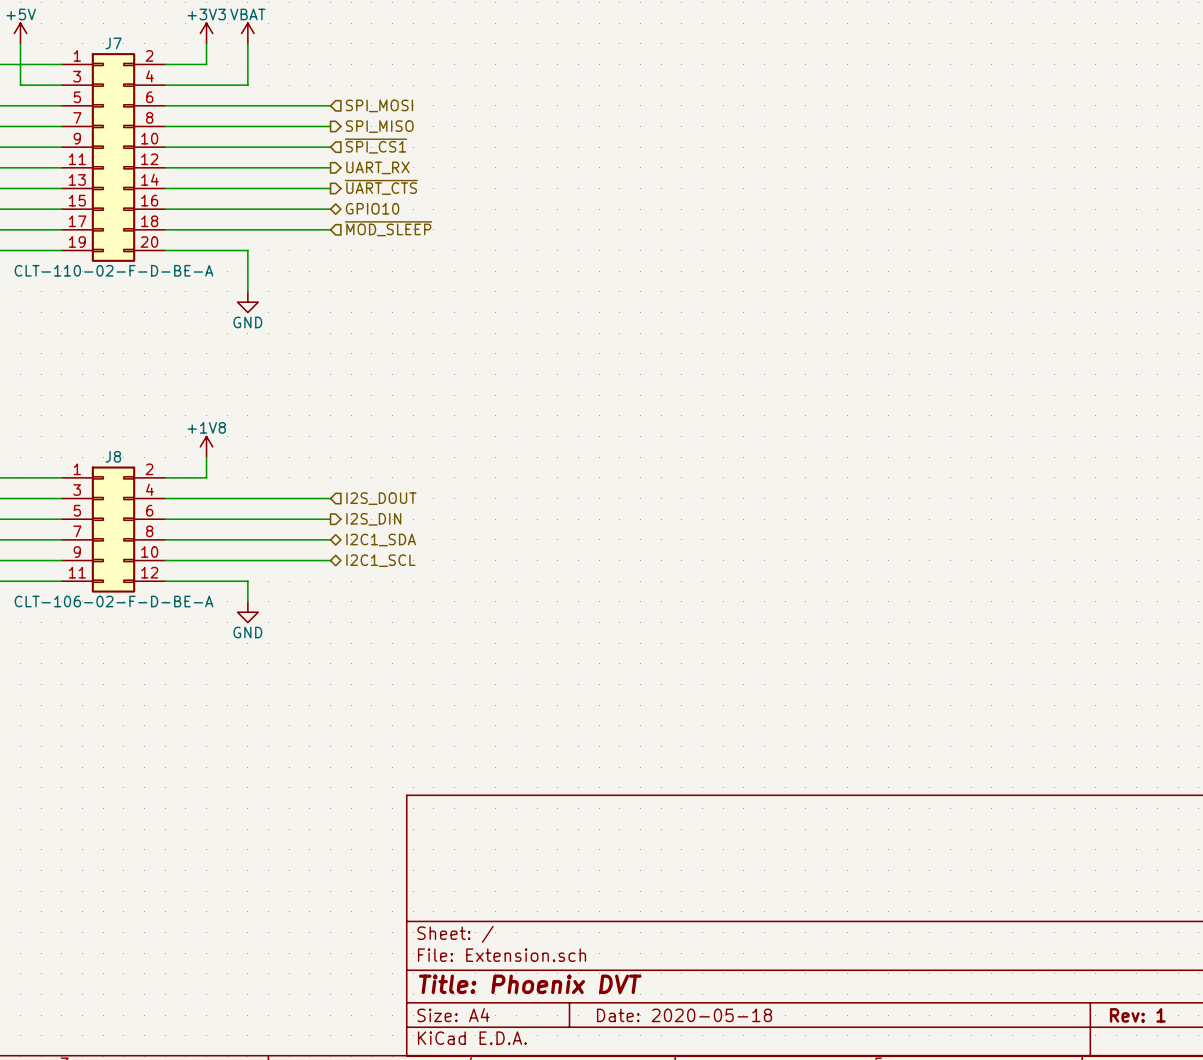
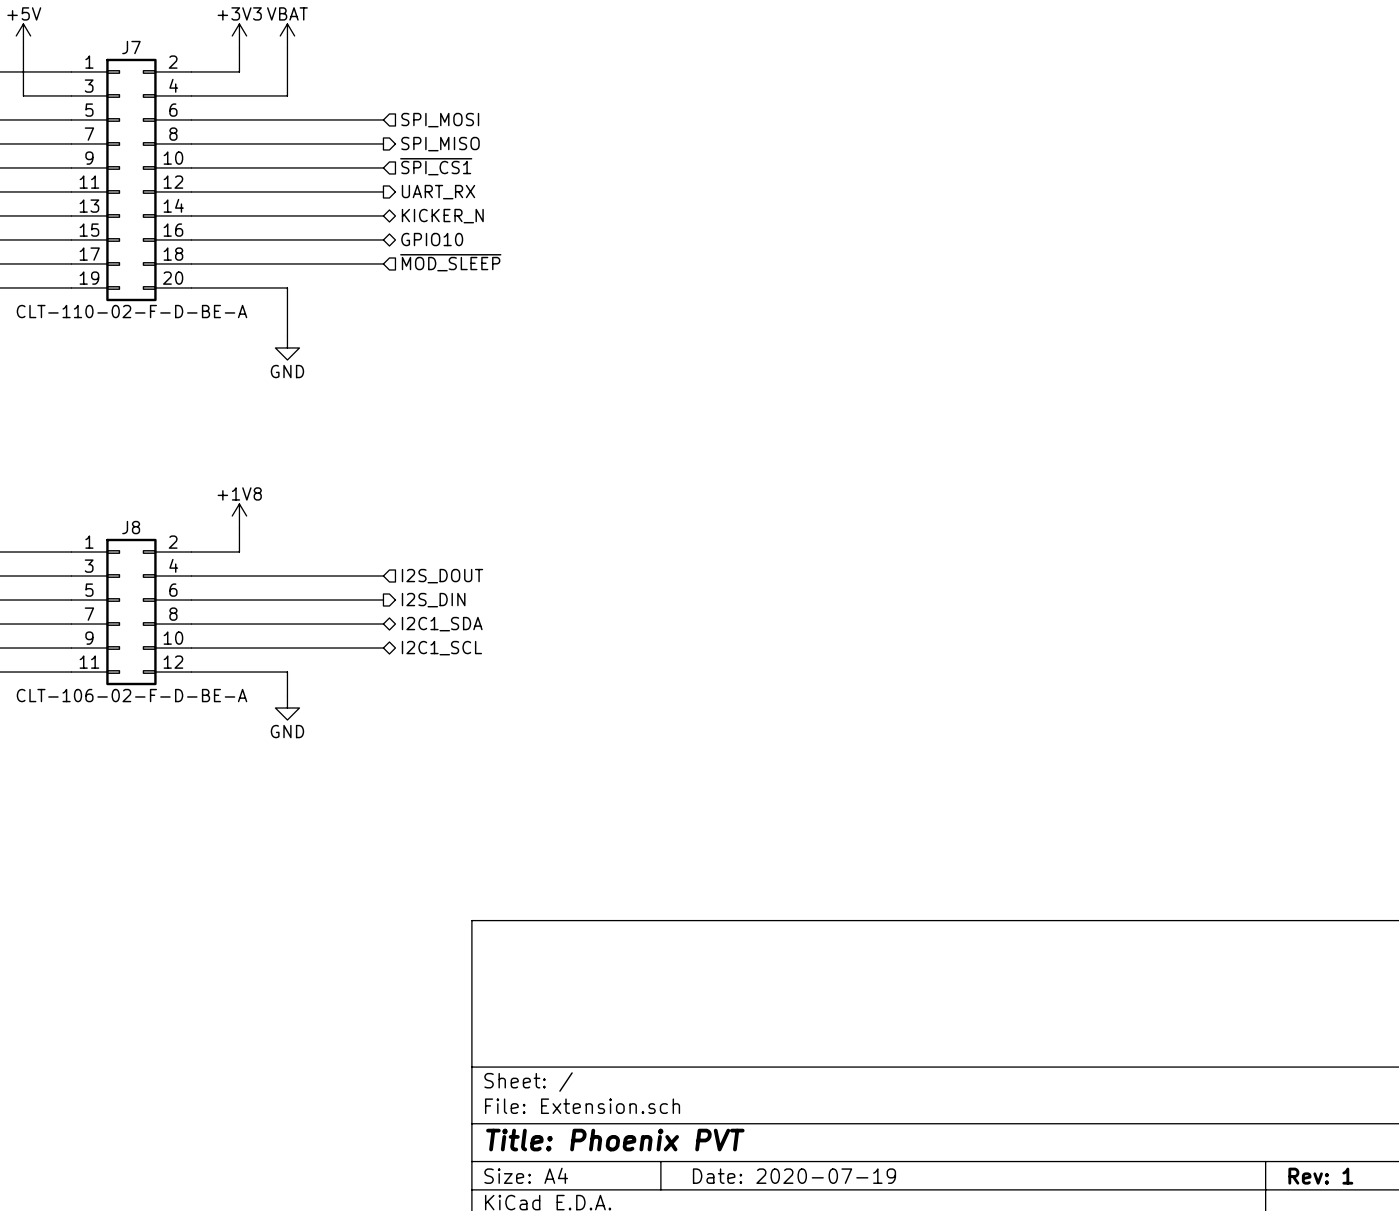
hierarchical label shape: output (381, 187) -> bidirectional (442, 216)
hierarchical label: ~{UART_CTS} (381, 187) -> KICKER_N (442, 216)
title block: Title: Phoenix DVT (530, 984) -> Title: Phoenix PVT (615, 1140)
title block: Date: 2020-05-18 (684, 1015) -> Date: 2020-07-19 (794, 1176)

